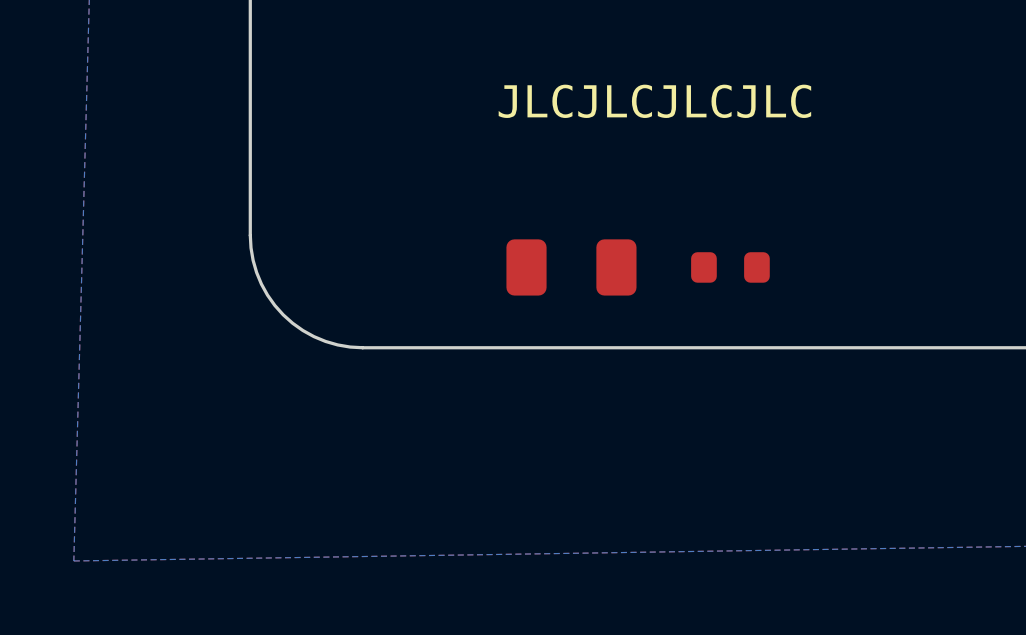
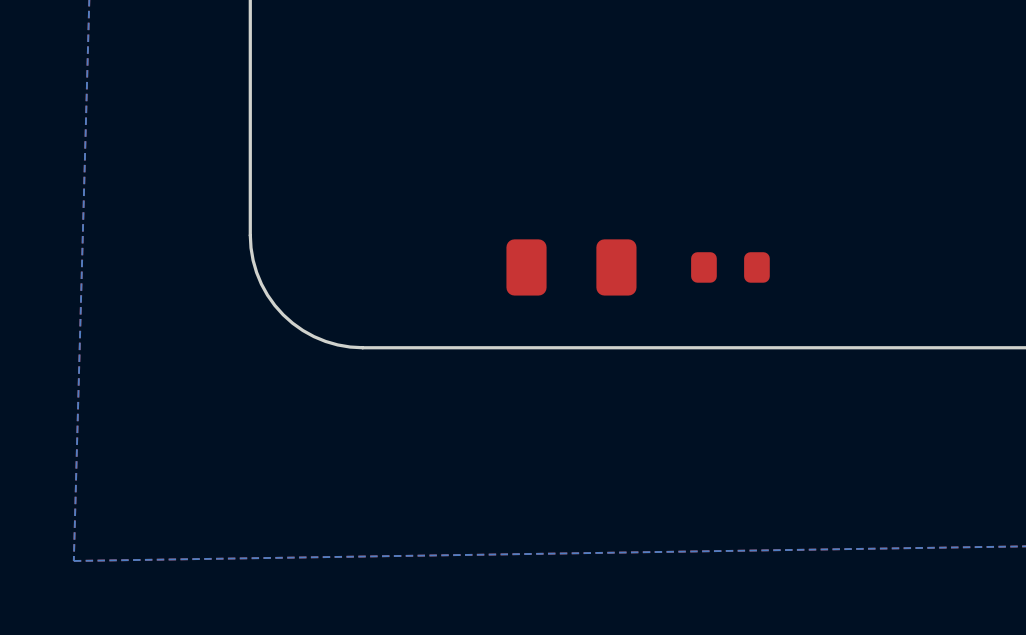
text: JLCJLCJLCJLC (654, 101) -> none

